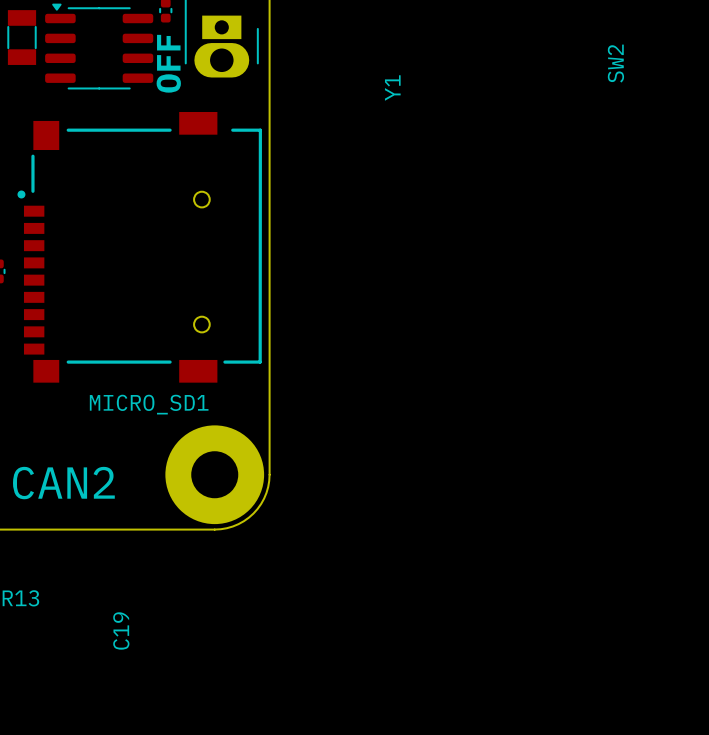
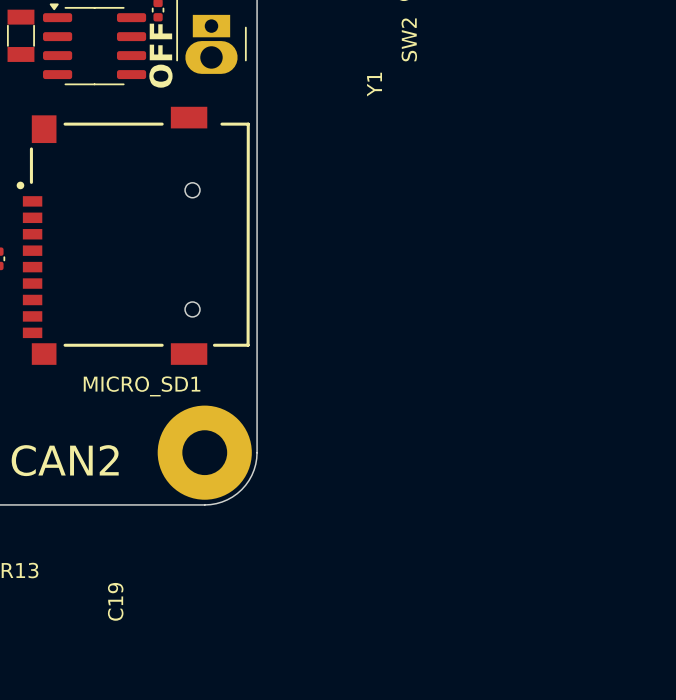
SW2 name position: SW2 (615, 63) -> SW2 (409, 39)

